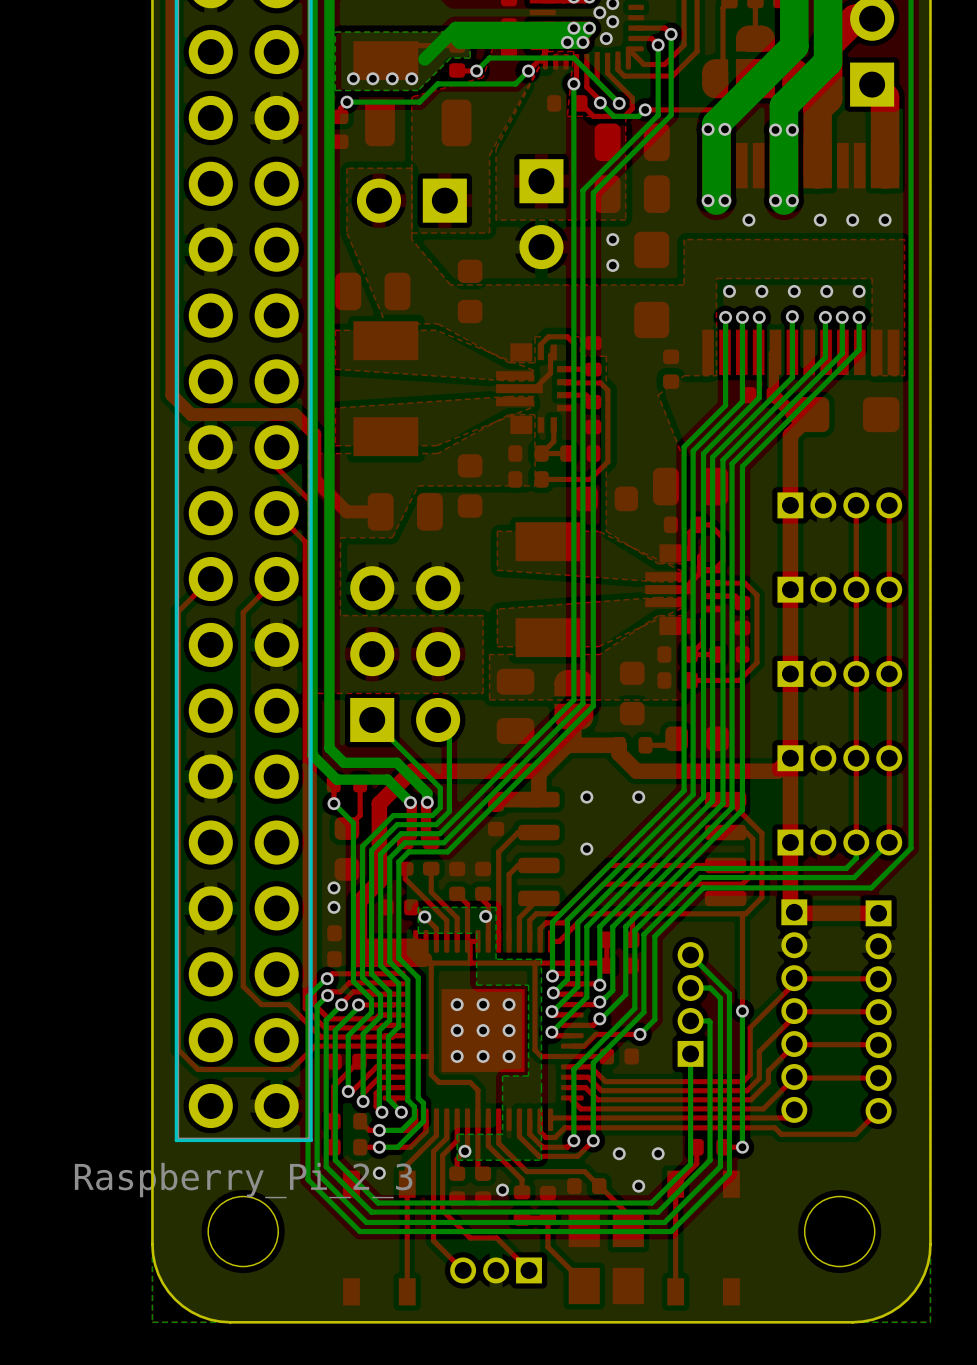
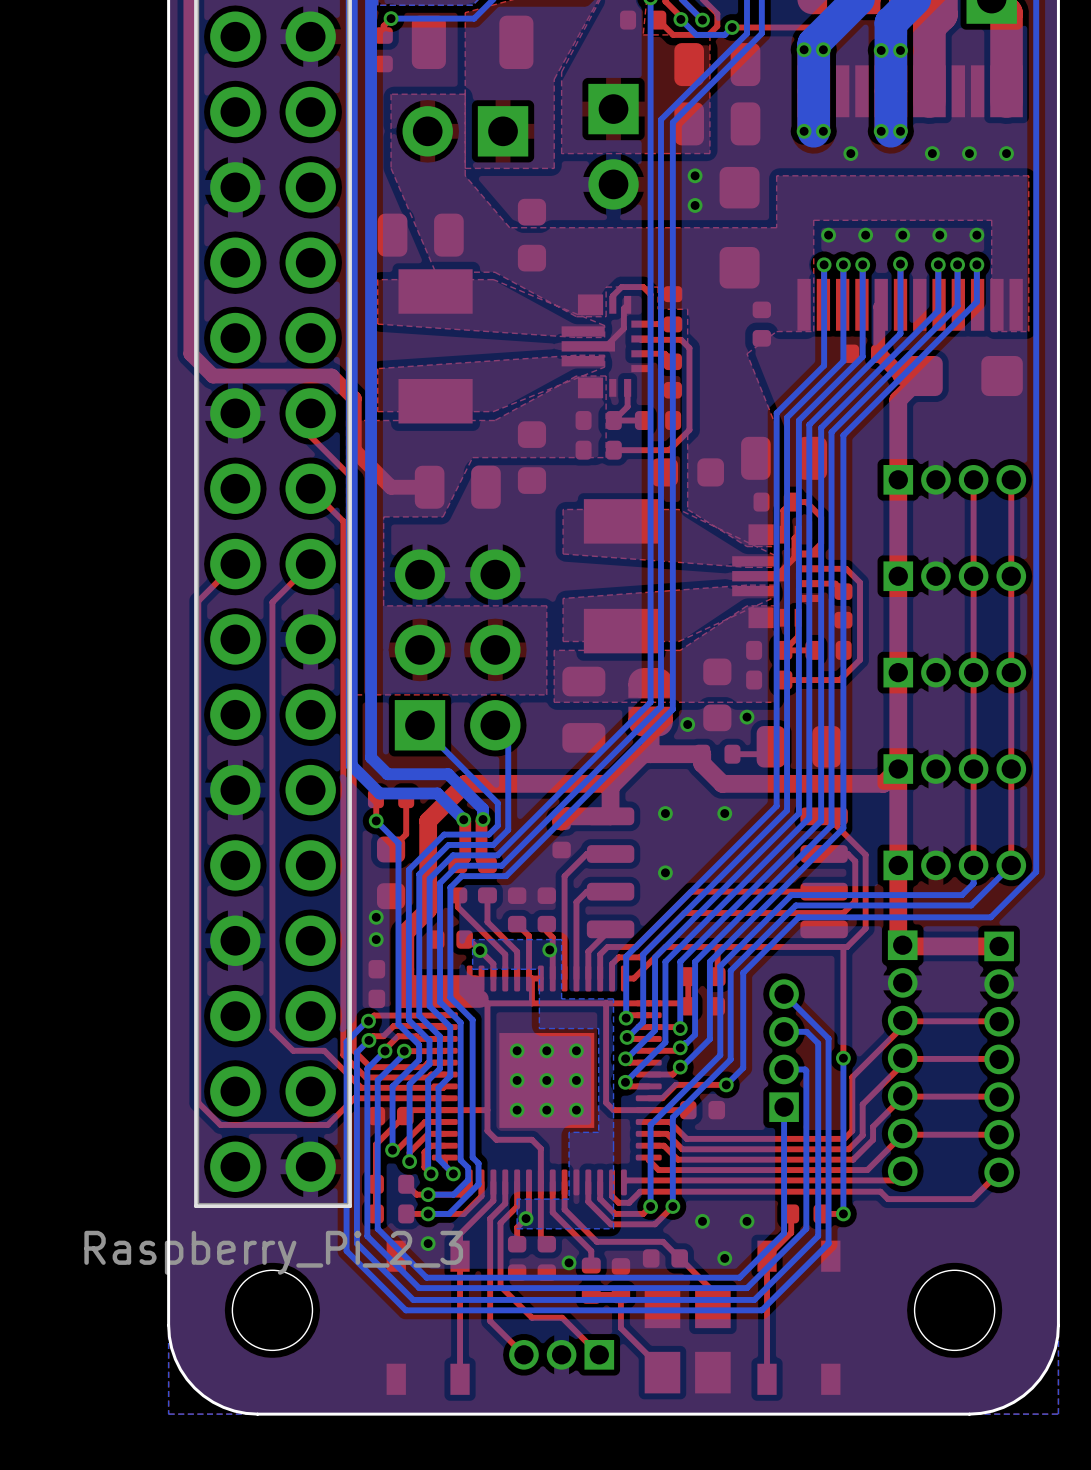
via: none -> (747, 717)
via: none -> (687, 724)
part footprint: [665, 726, 729, 752] -> [756, 726, 842, 768]

